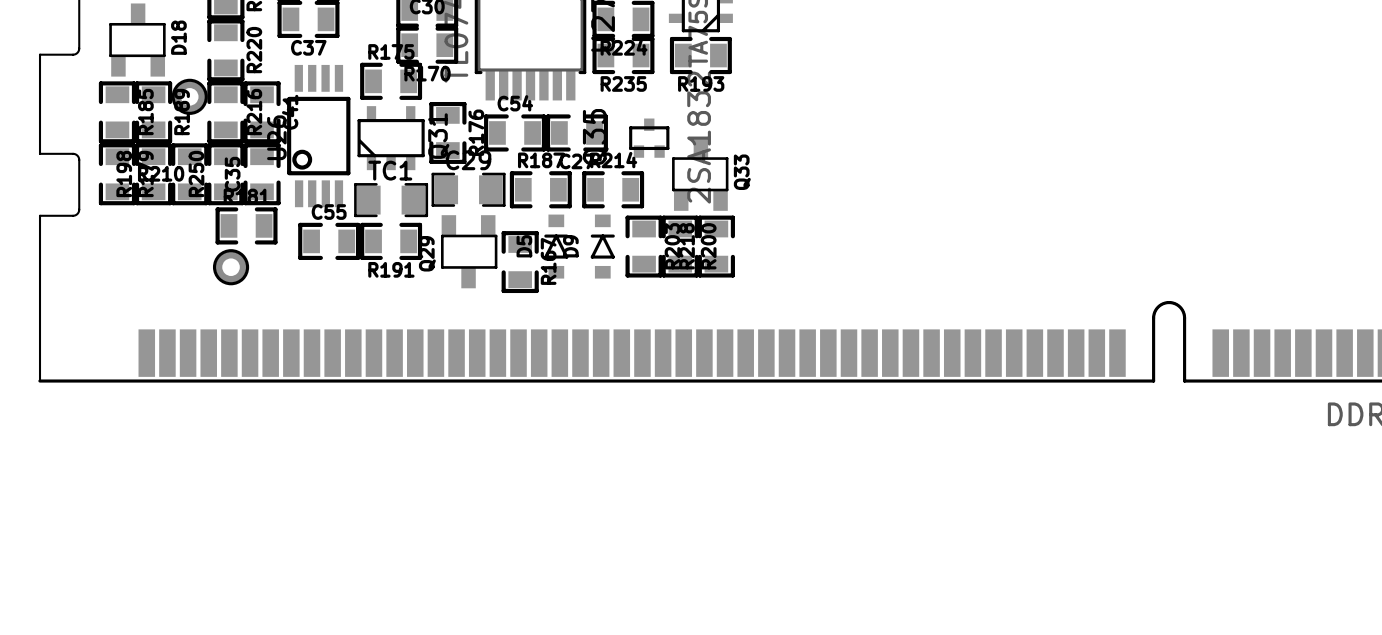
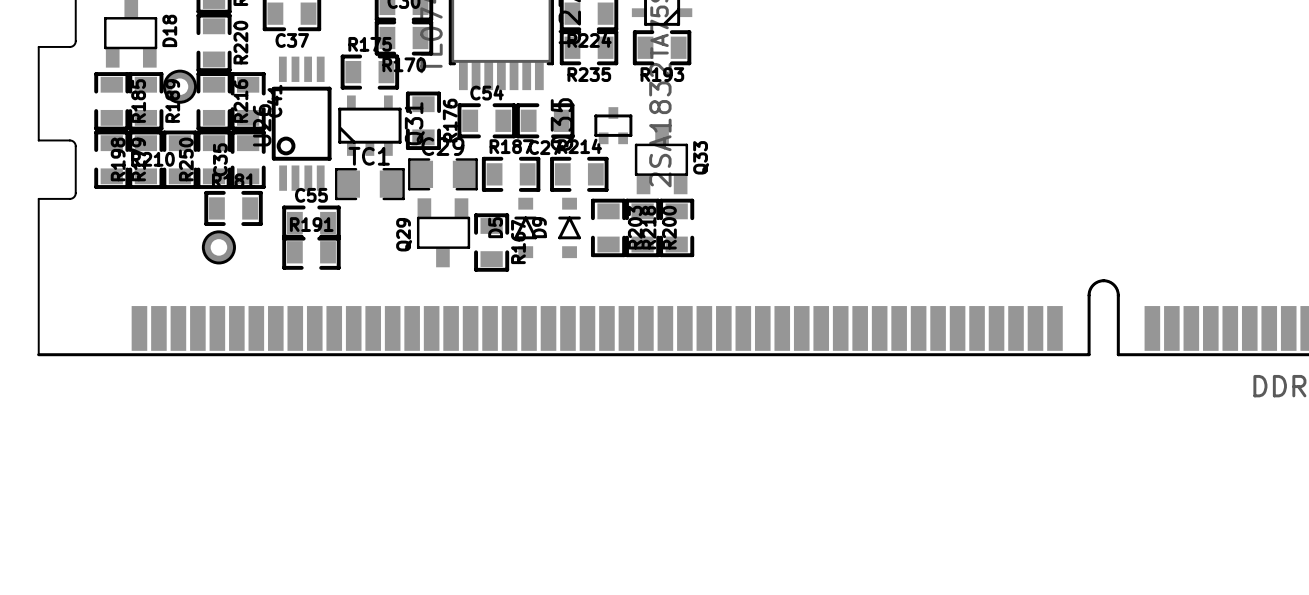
R191 position: (391, 241) -> (311, 252)
R191 name position: R191 (391, 269) -> R191 (311, 224)

